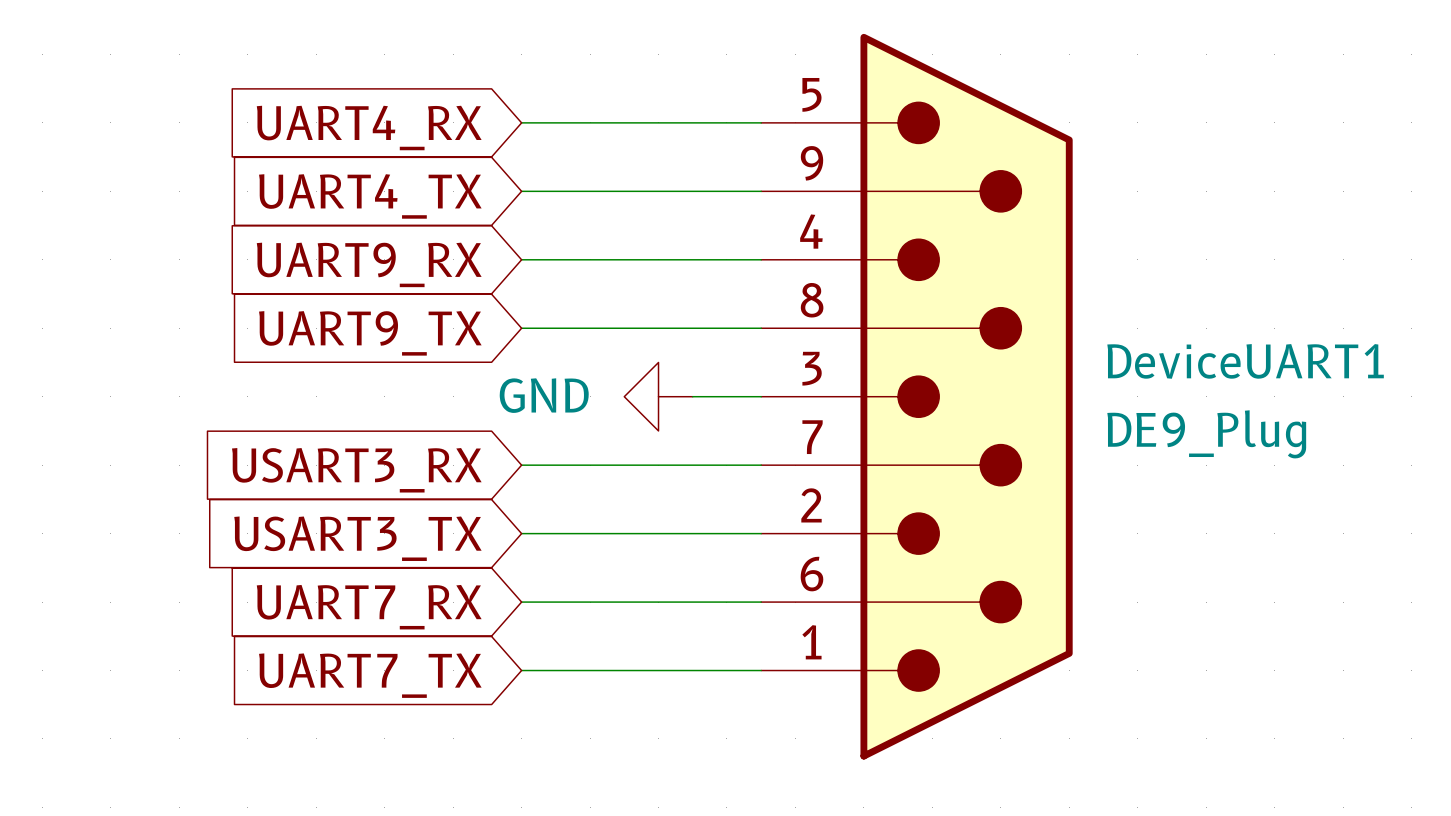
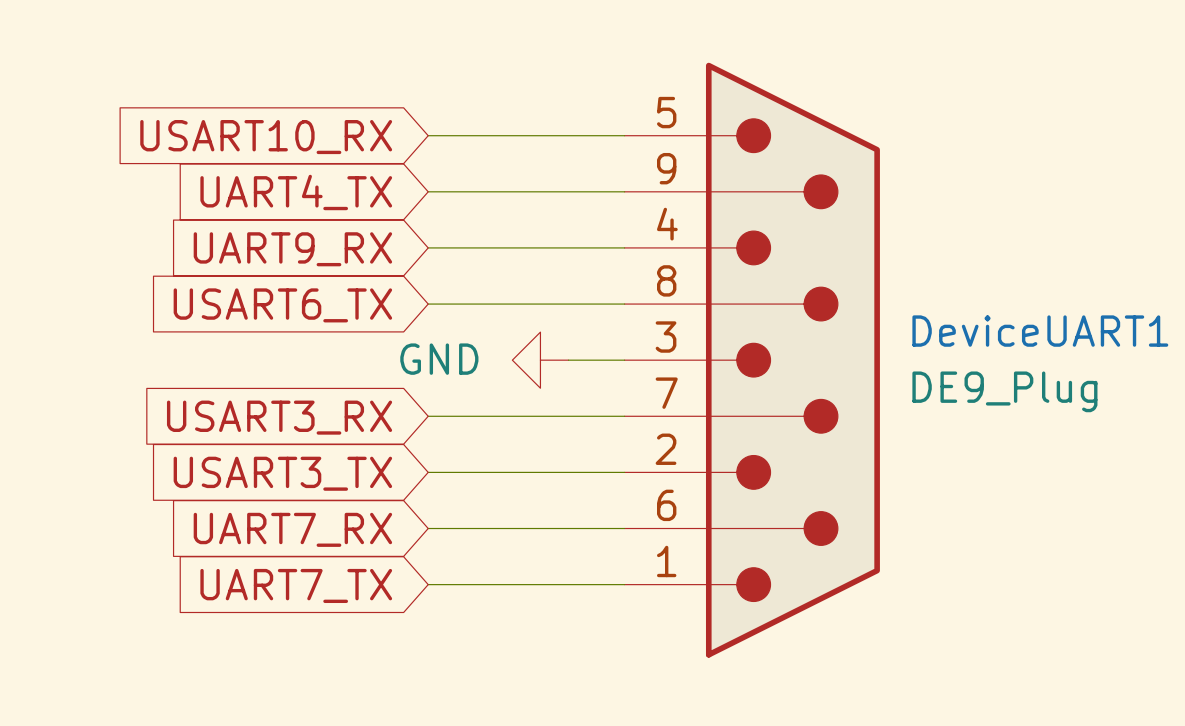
global label: UART4_RX (369, 128) -> USART10_RX (266, 137)
global label: UART9_TX (370, 333) -> USART6_TX (282, 305)

